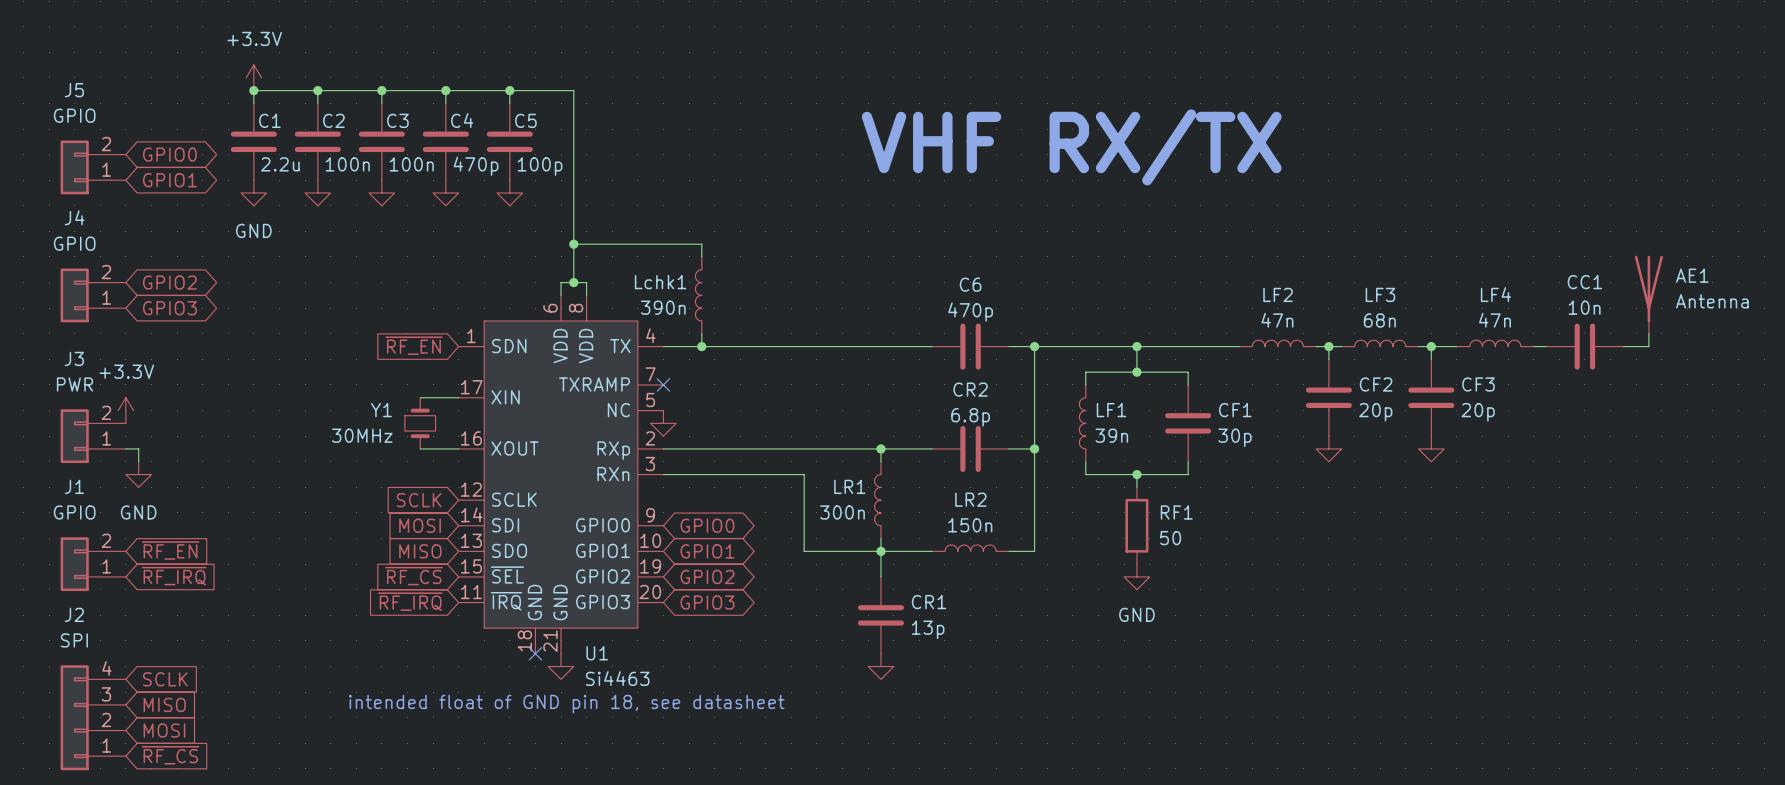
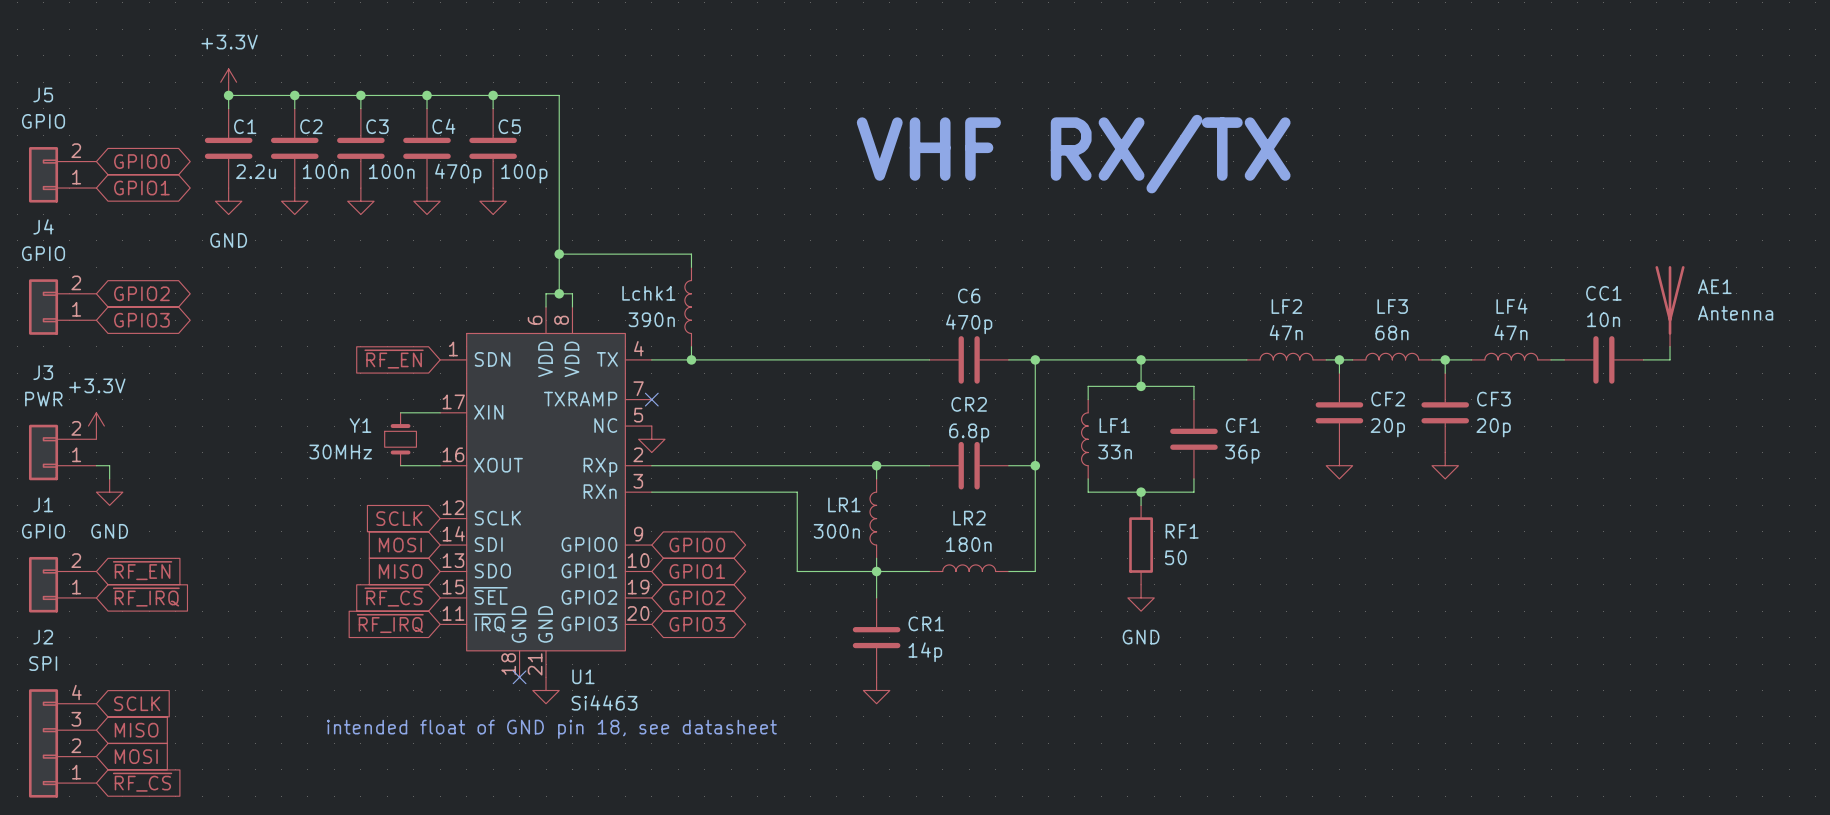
LF1 value: 39n (1111, 435) -> 33n (1115, 451)
CF1 value: 30p (1234, 437) -> 36p (1242, 454)
LR2 value: 150n (970, 525) -> 180n (968, 544)
CR1 value: 13p (928, 629) -> 14p (925, 652)

